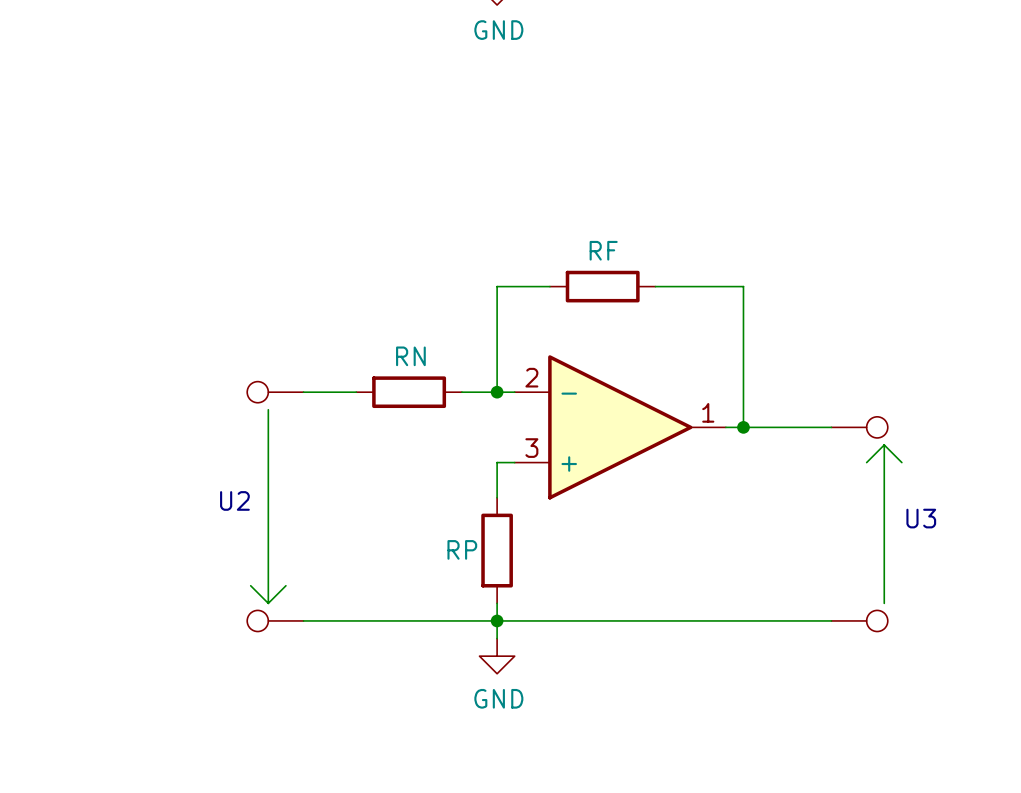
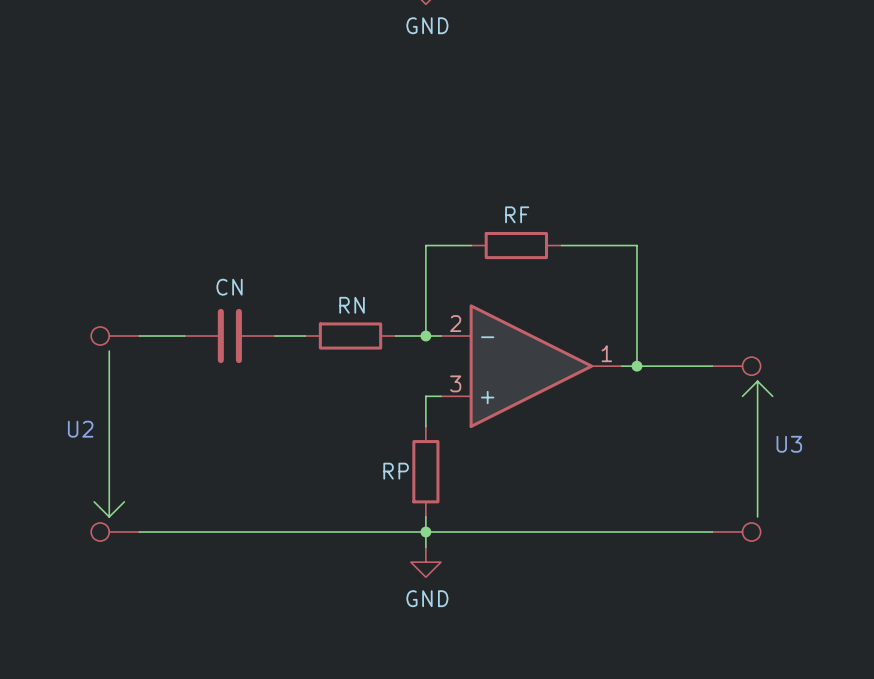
part: none -> (115, 336)
wire: none -> (139, 336) (184, 336)
CN: none -> (229, 336)
part: (275, 392) -> none
wire: (268, 409) (268, 603) -> (109, 351) (109, 516)
text position: U2 (234, 500) -> U2 (80, 429)
wire: (250, 585) (268, 603) -> (94, 501) (109, 516)
wire: (285, 585) (268, 603) -> (124, 501) (109, 516)
part: none -> (115, 532)
wire: none -> (139, 532) (260, 532)
part: (275, 620) -> none

